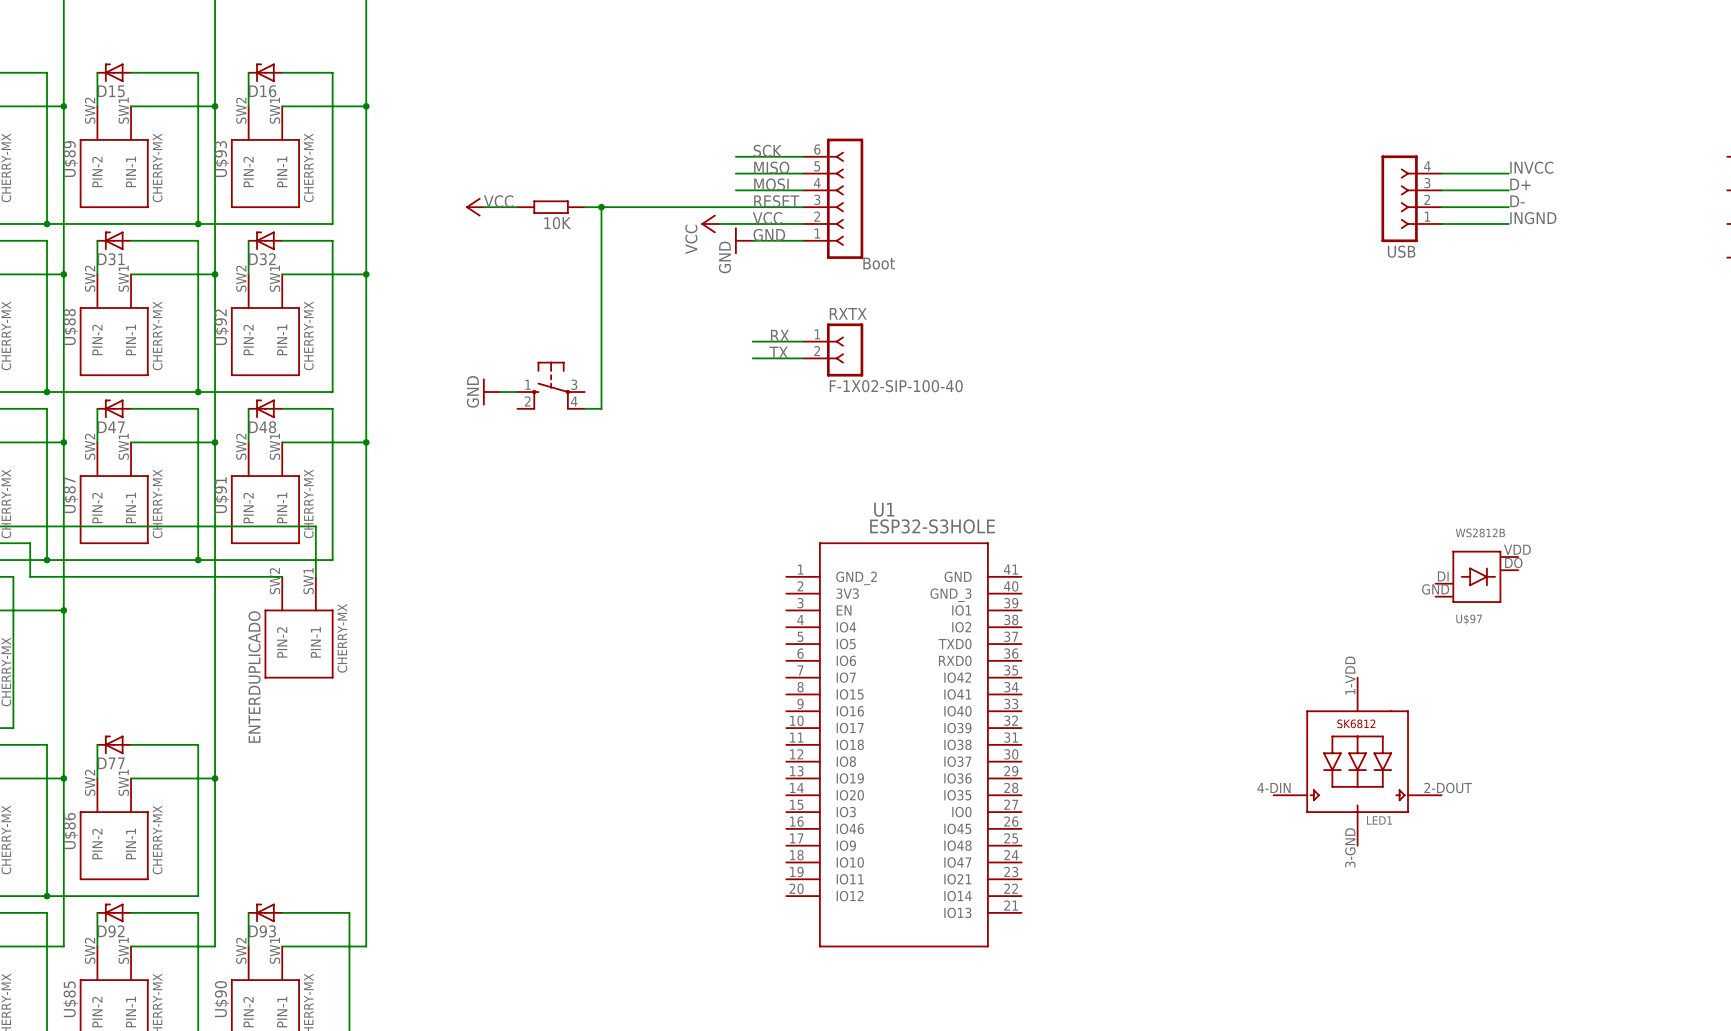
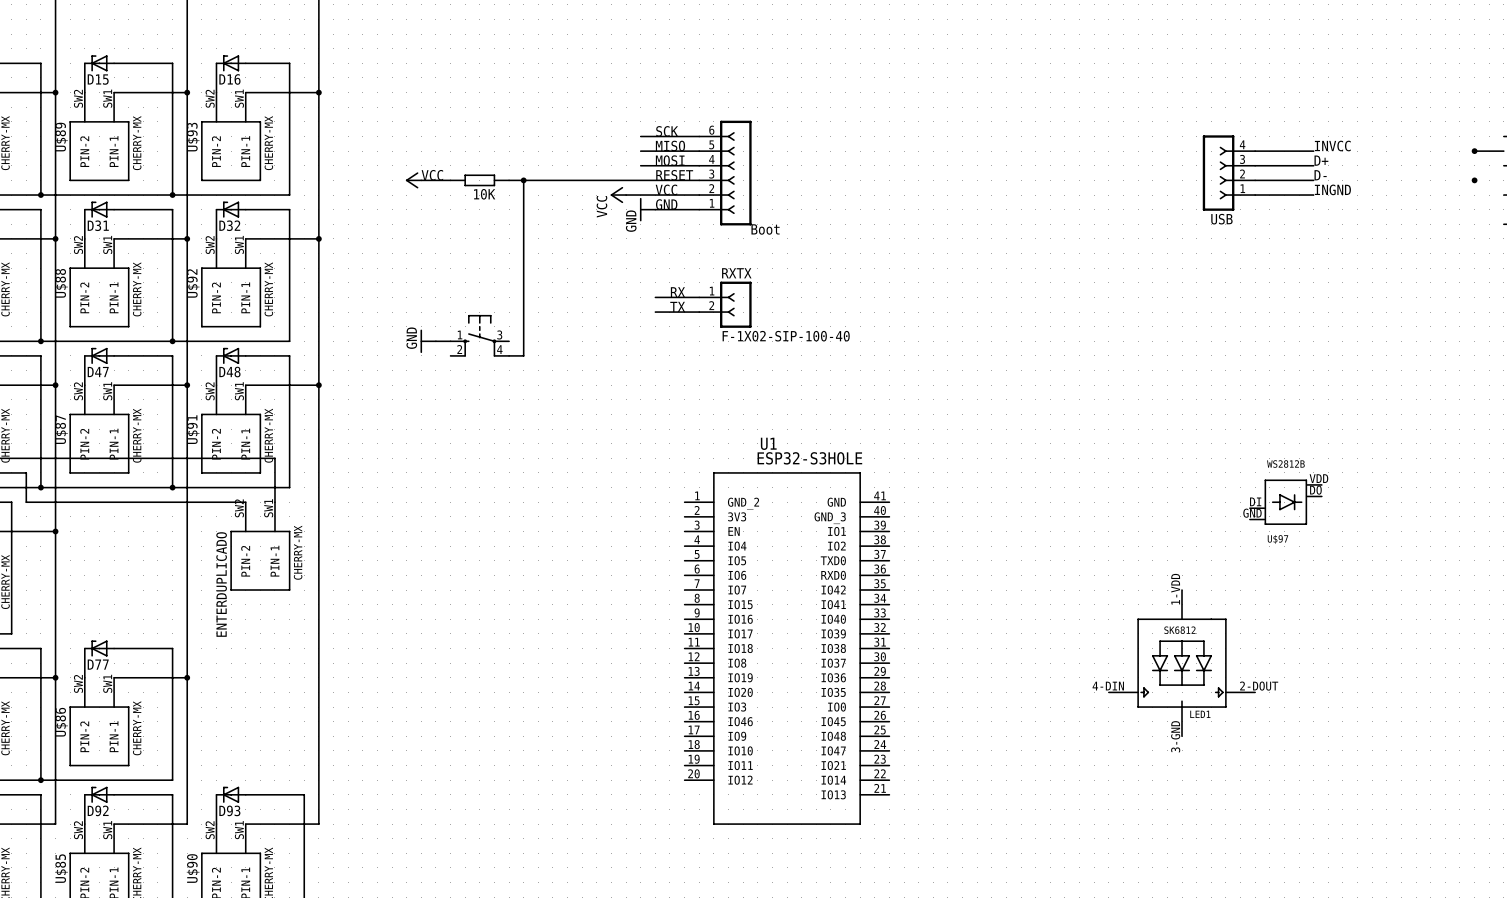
wire: none -> (1474, 151) (1503, 151)
junction: none -> (1474, 151)
junction: none -> (1474, 180)

